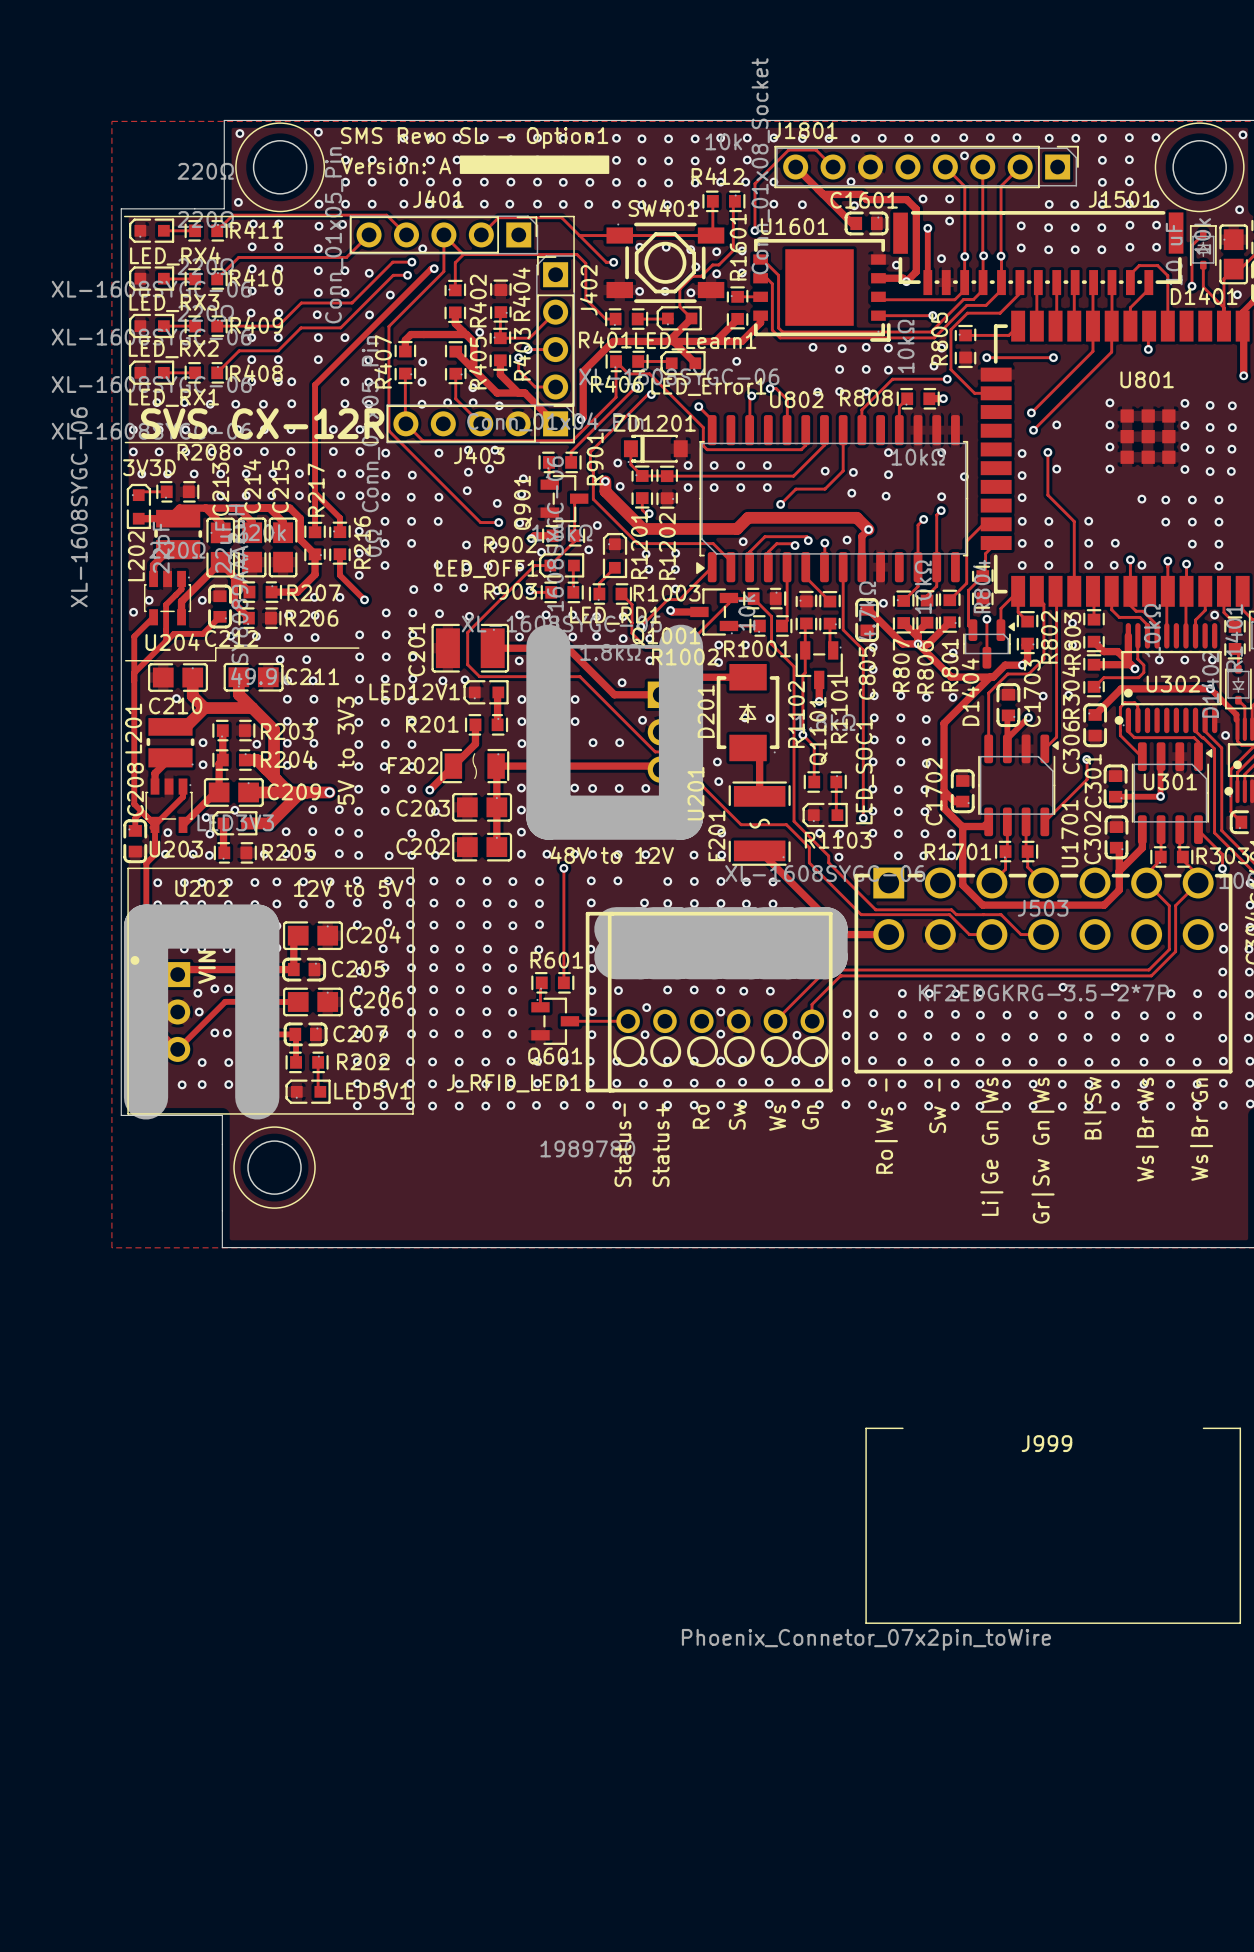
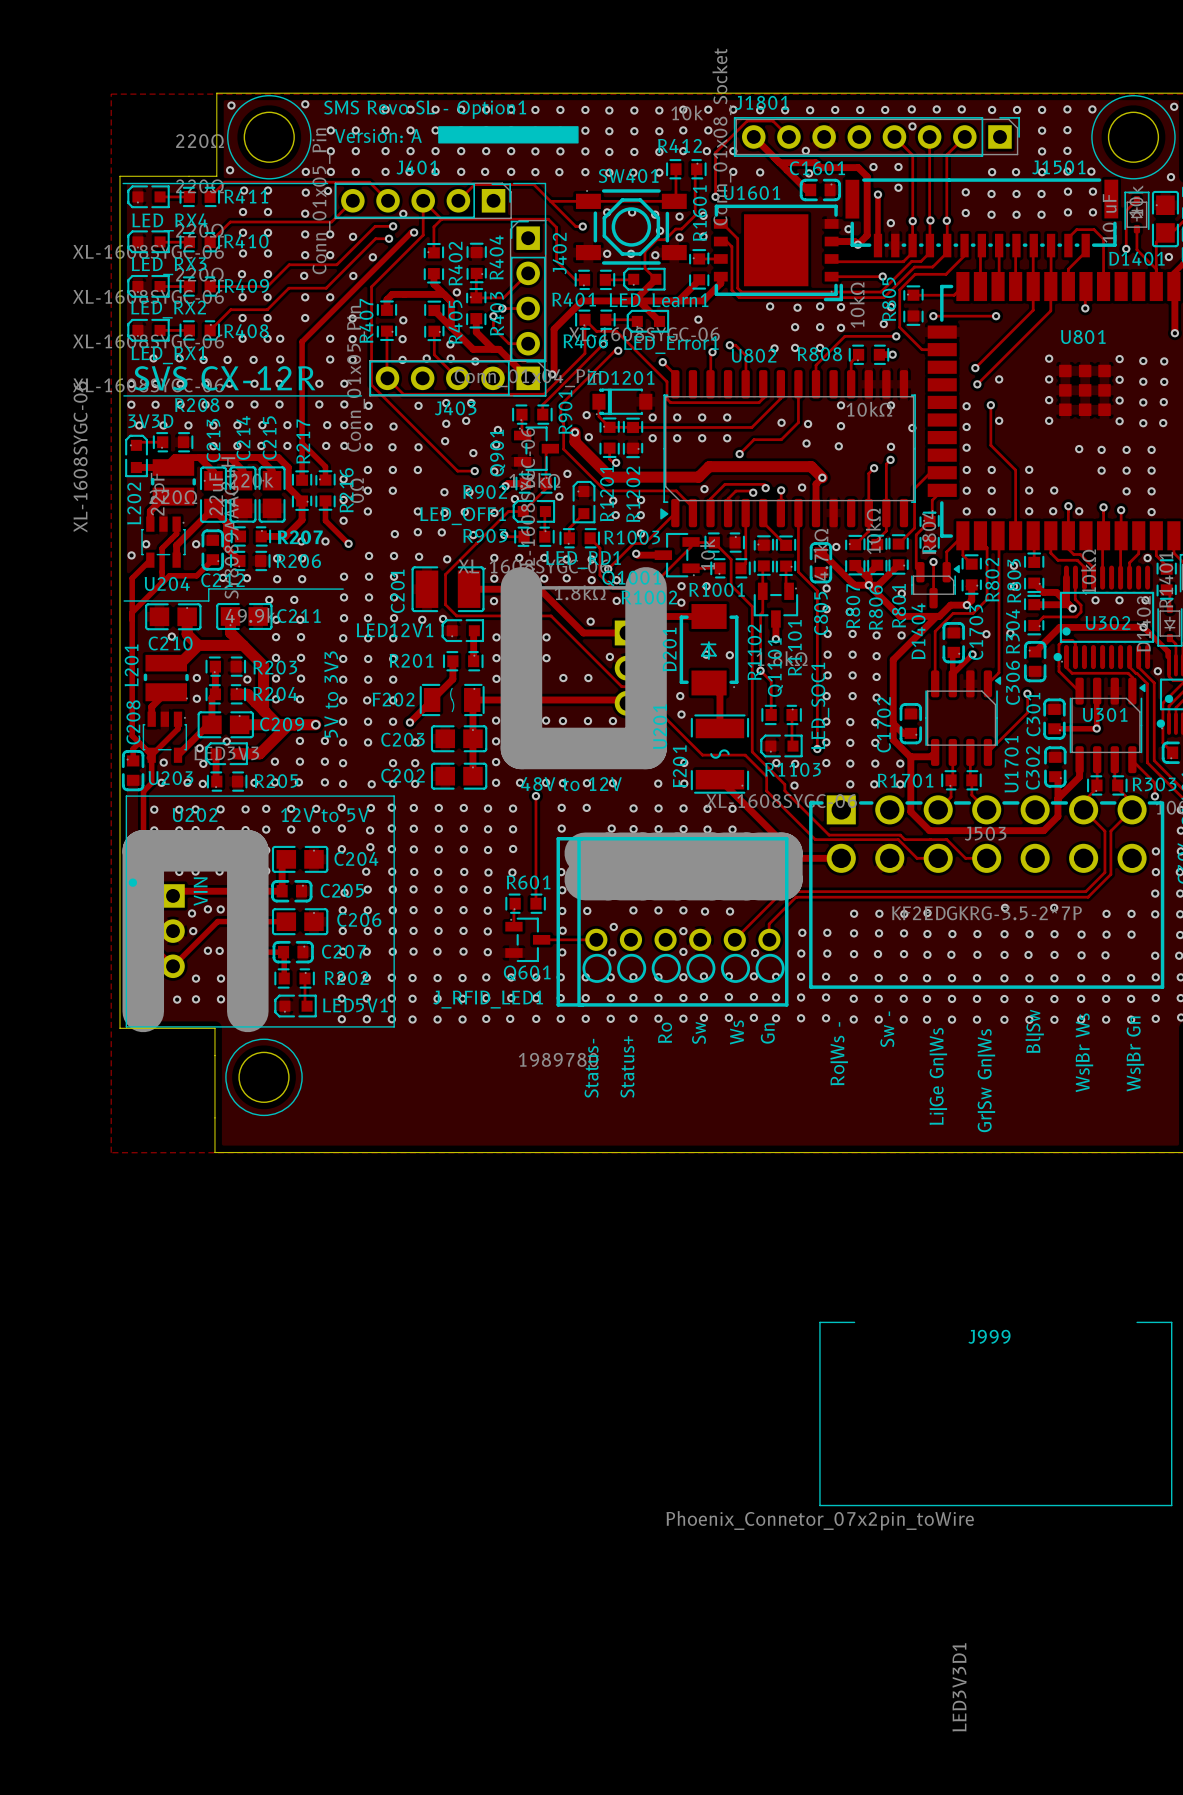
3V3D name: 3V3D (149, 467) -> LED3V3D1 (959, 1687)
text: none -> 3V3D (150, 421)

